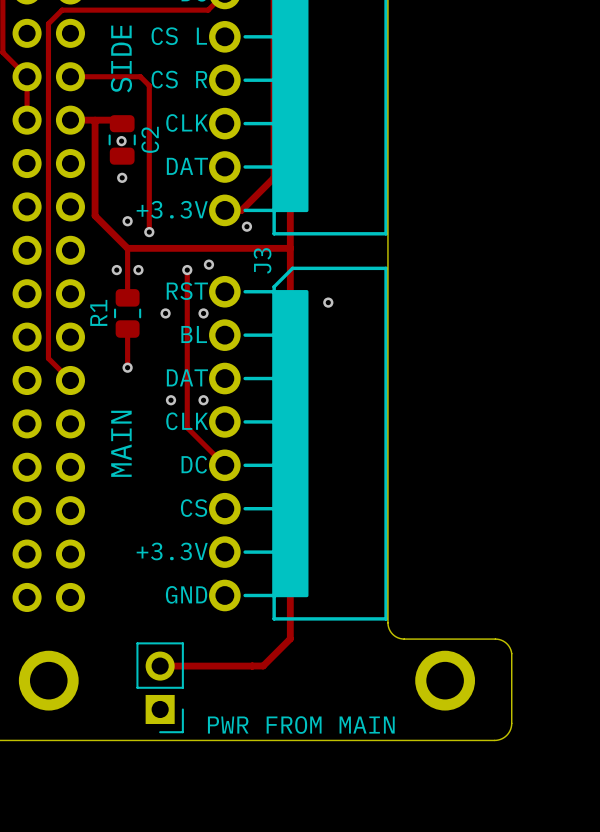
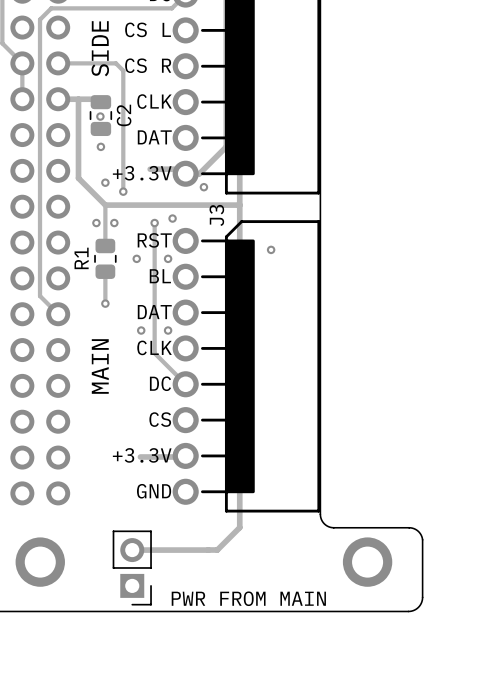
track: none -> (150, 169) (181, 169)
track: none -> (140, 456) (184, 456)

